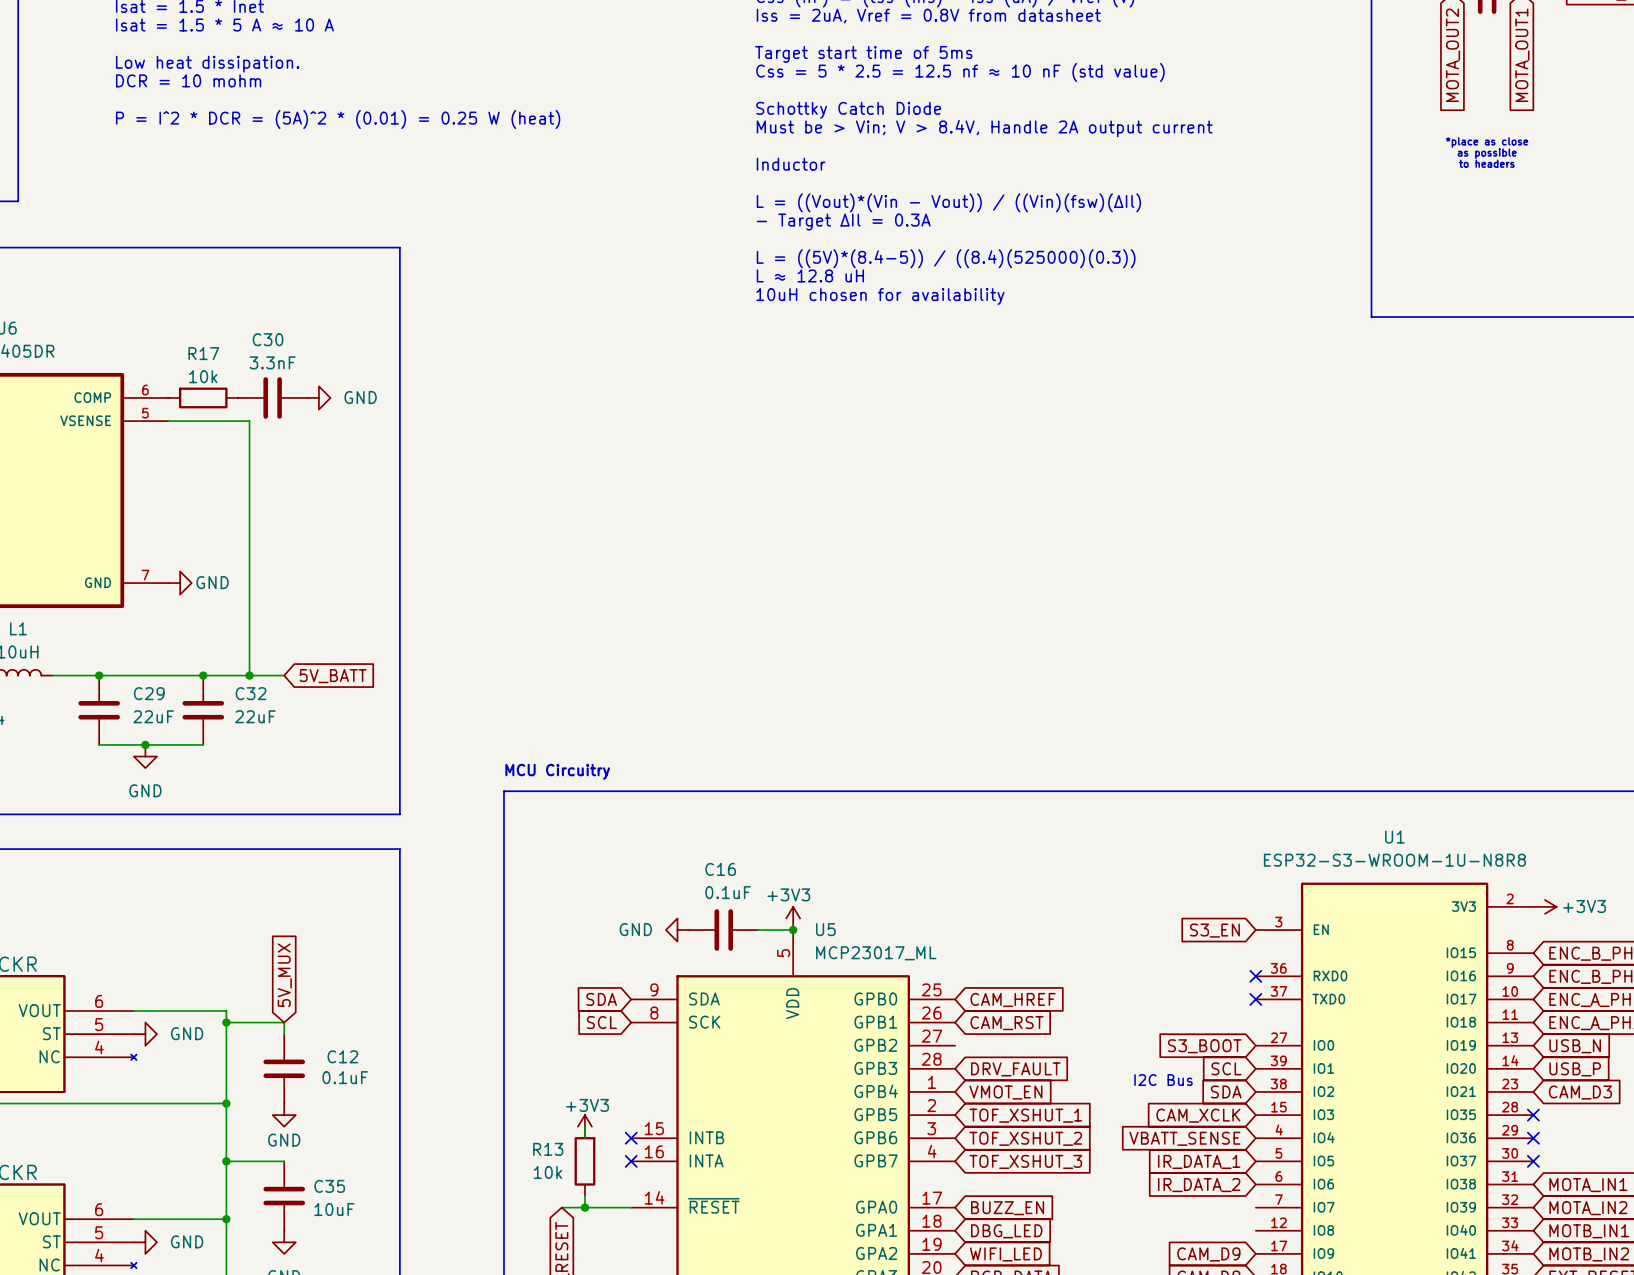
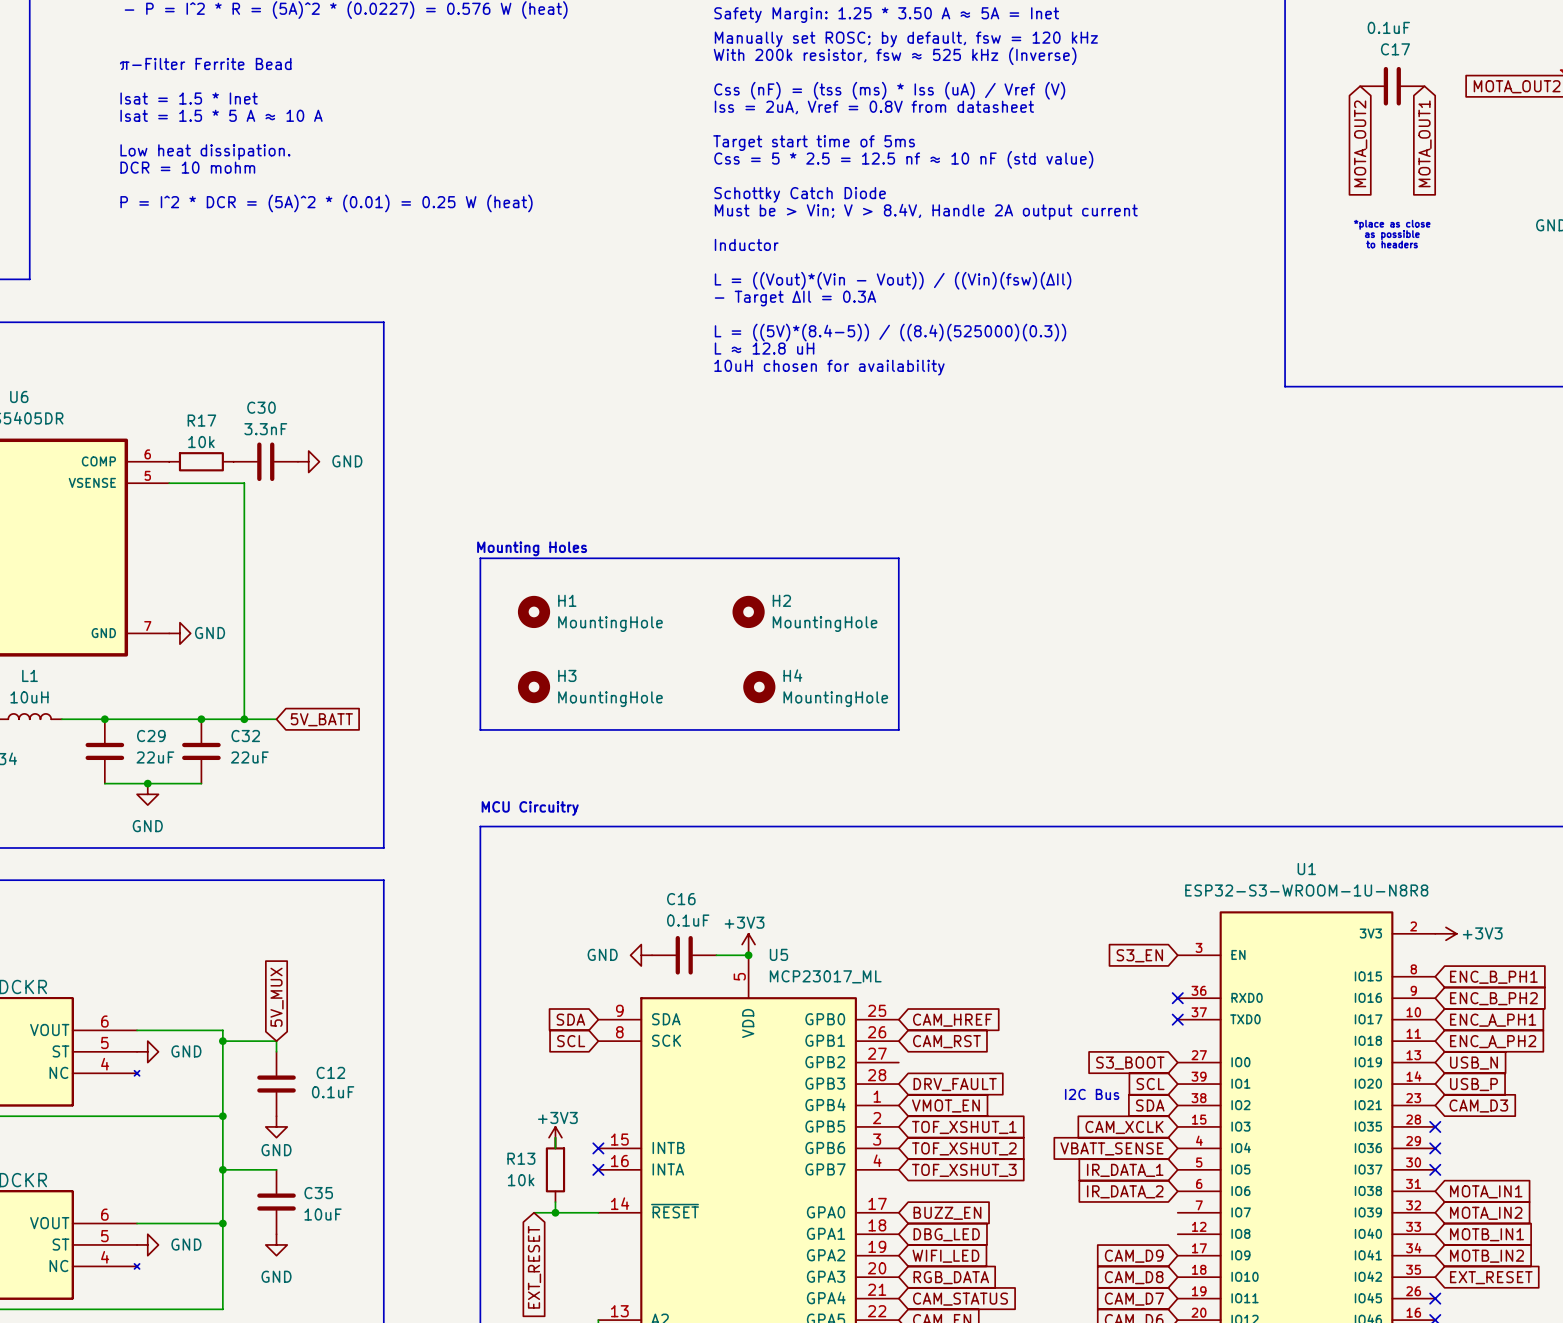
text: none -> Mounting Holes (532, 548)
line: none -> (480, 558) (898, 558) (898, 729) (480, 729) (480, 558)
H1: none -> MountingHole (534, 611)
H2: none -> MountingHole (748, 611)
H3: none -> MountingHole (534, 687)
H4: none -> MountingHole (759, 687)

